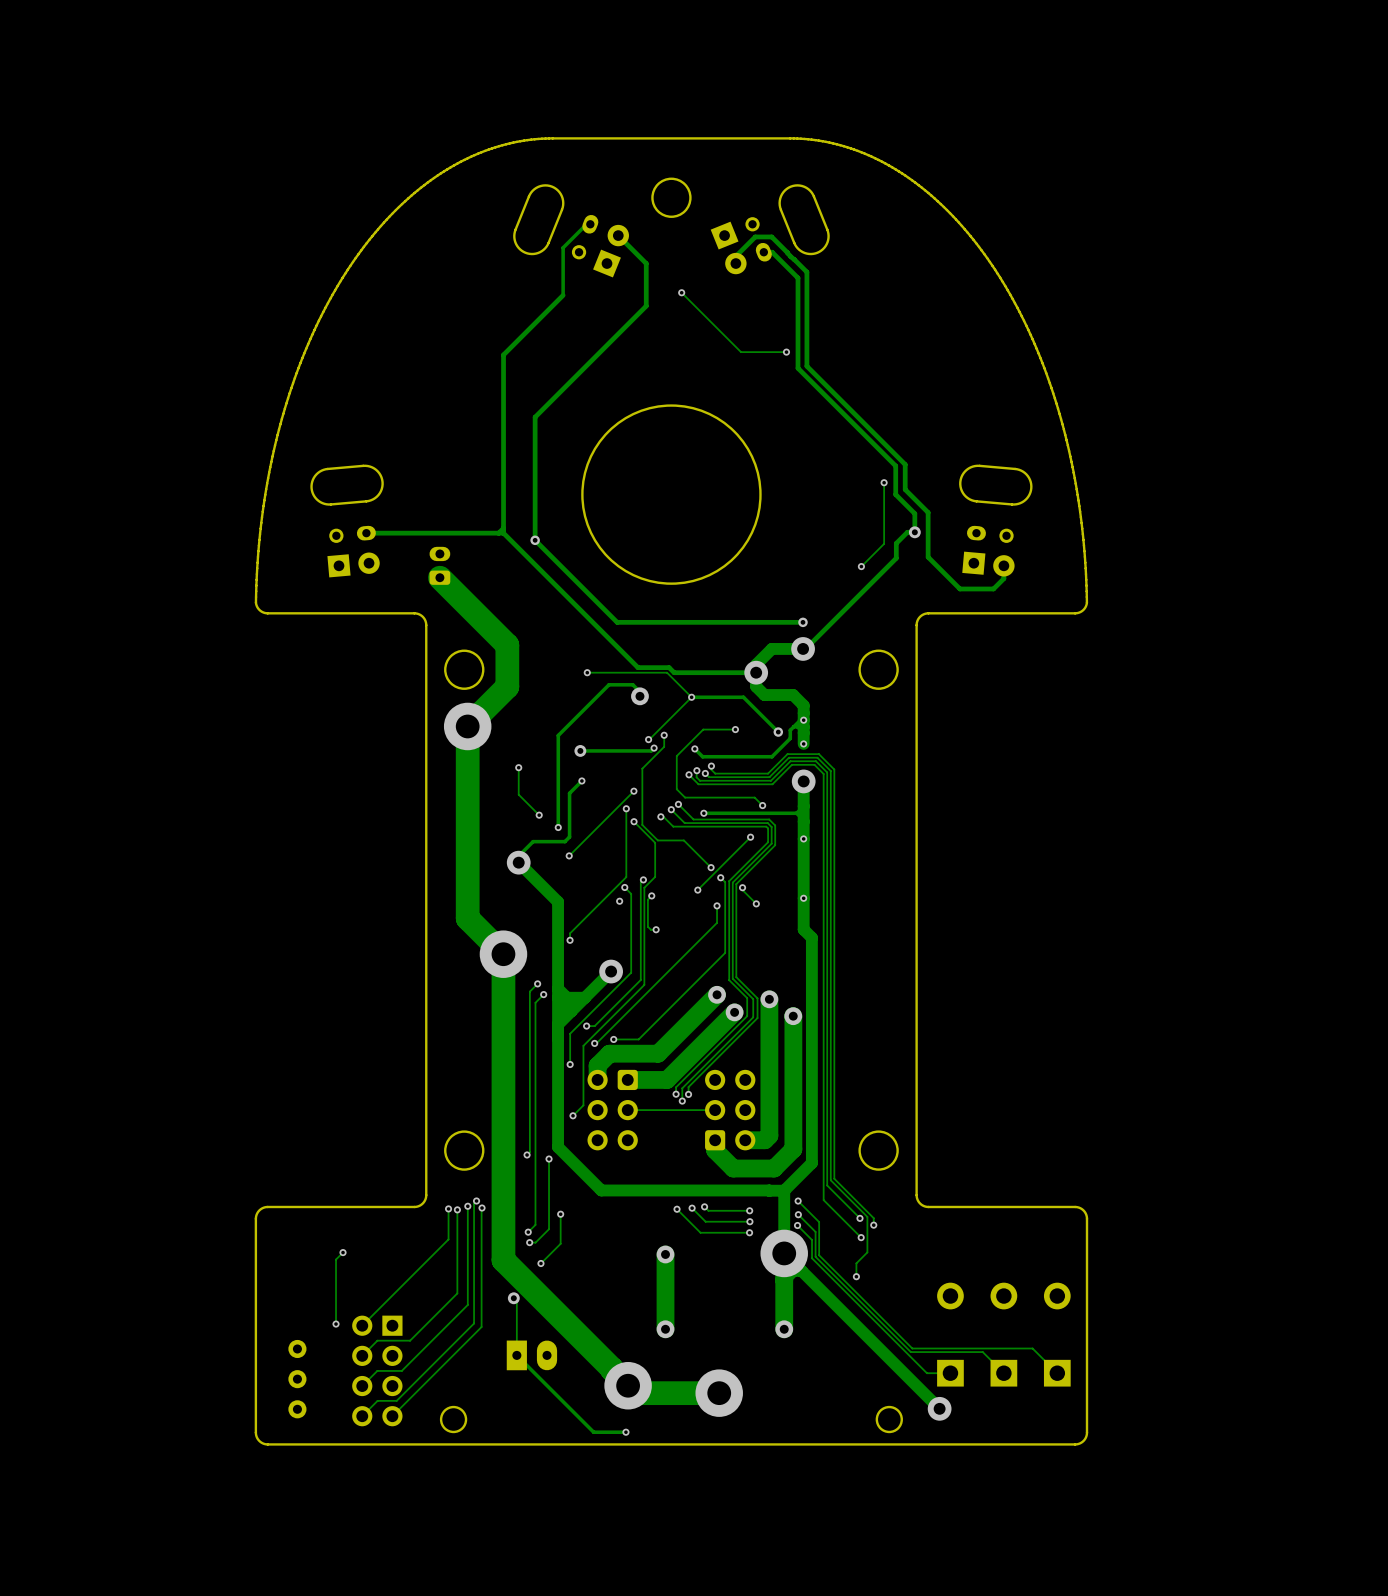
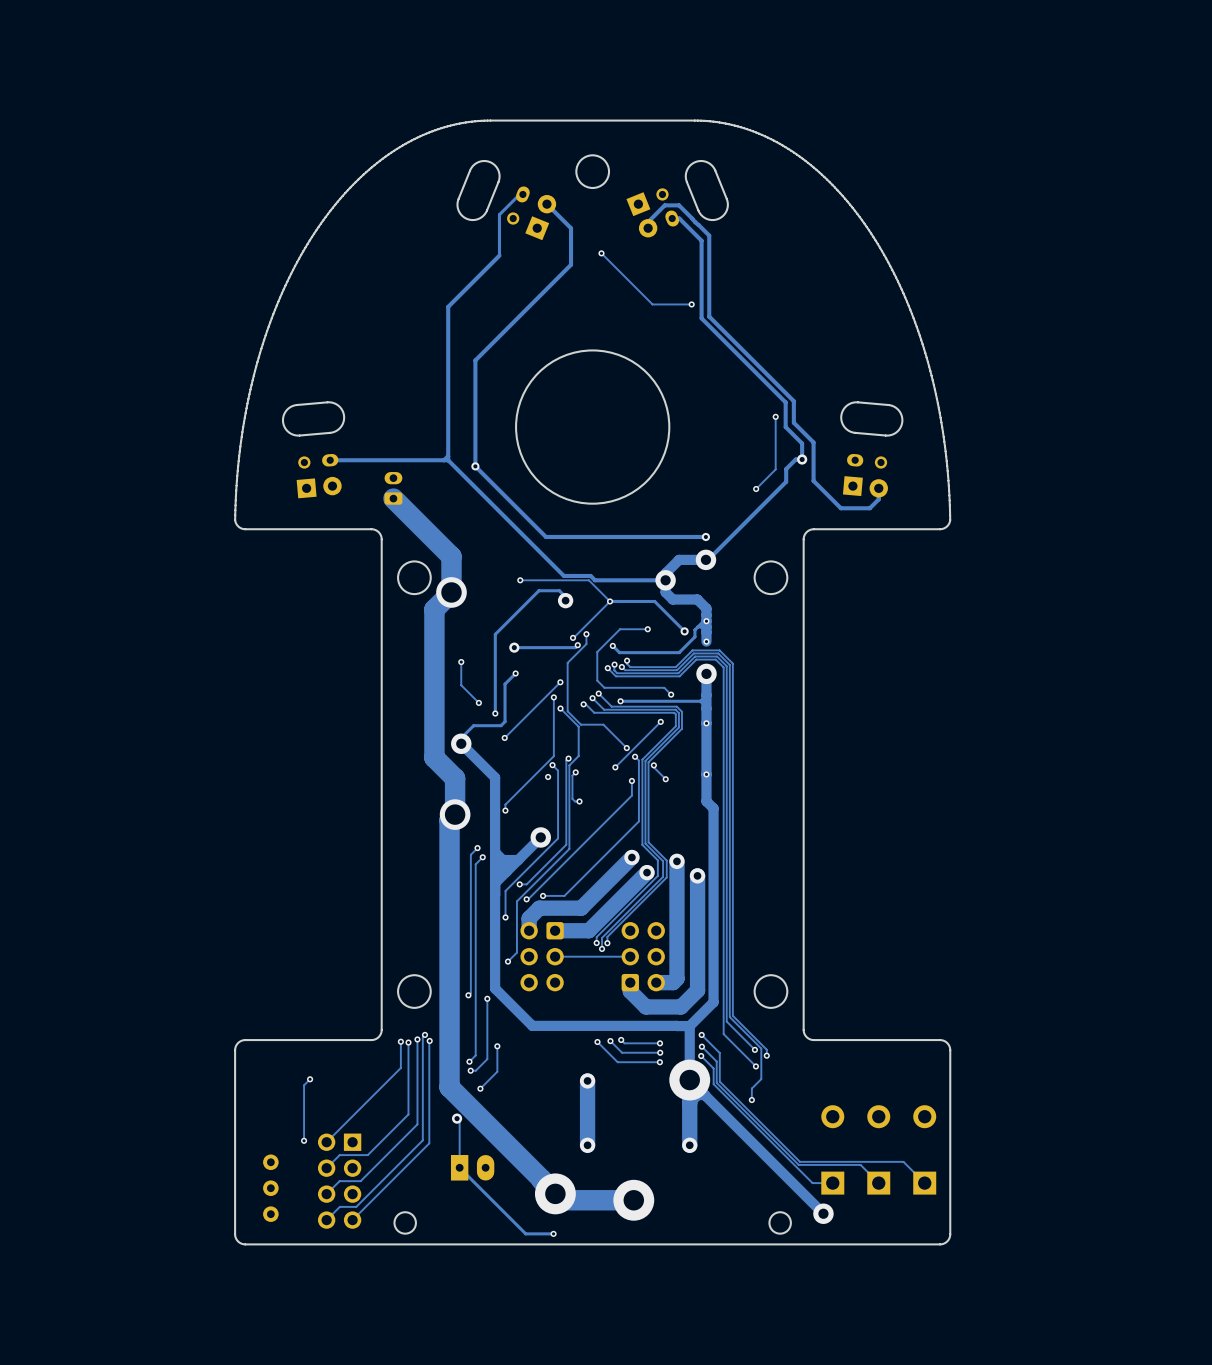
via: none -> (451, 592)
track: (487, 706) (467, 726) (467, 918) (503, 954) (503, 1260) (505, 1261) -> (434, 609) (434, 757) (455, 778) (455, 814) (449, 820) (449, 1087)
via: (467, 726) -> none
via: none -> (455, 814)
via: (503, 954) -> none

